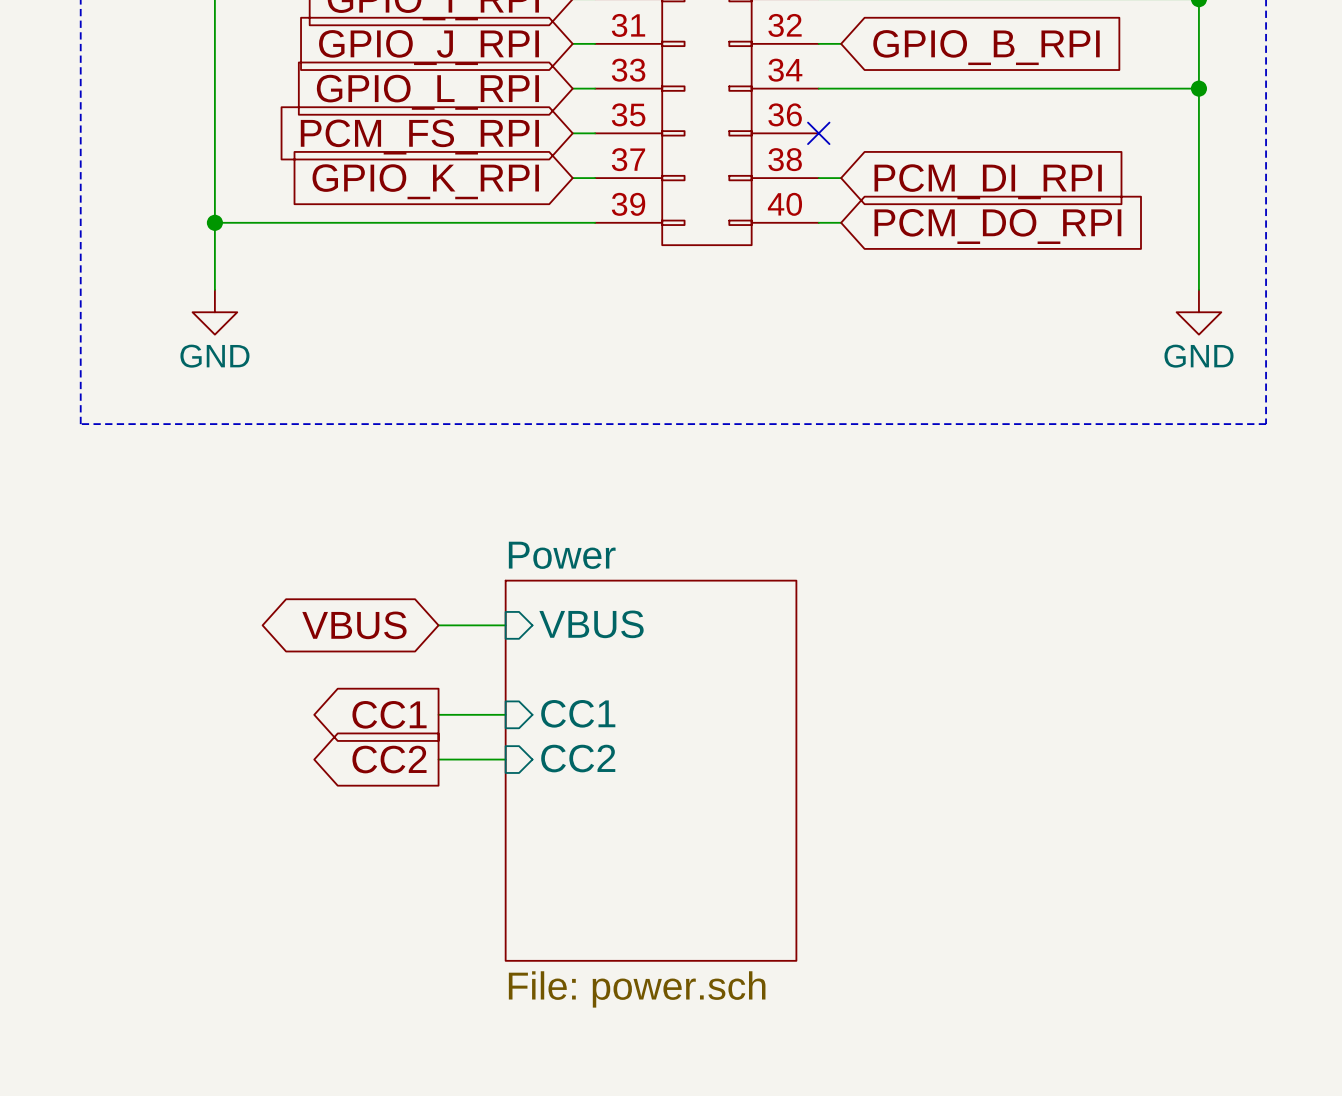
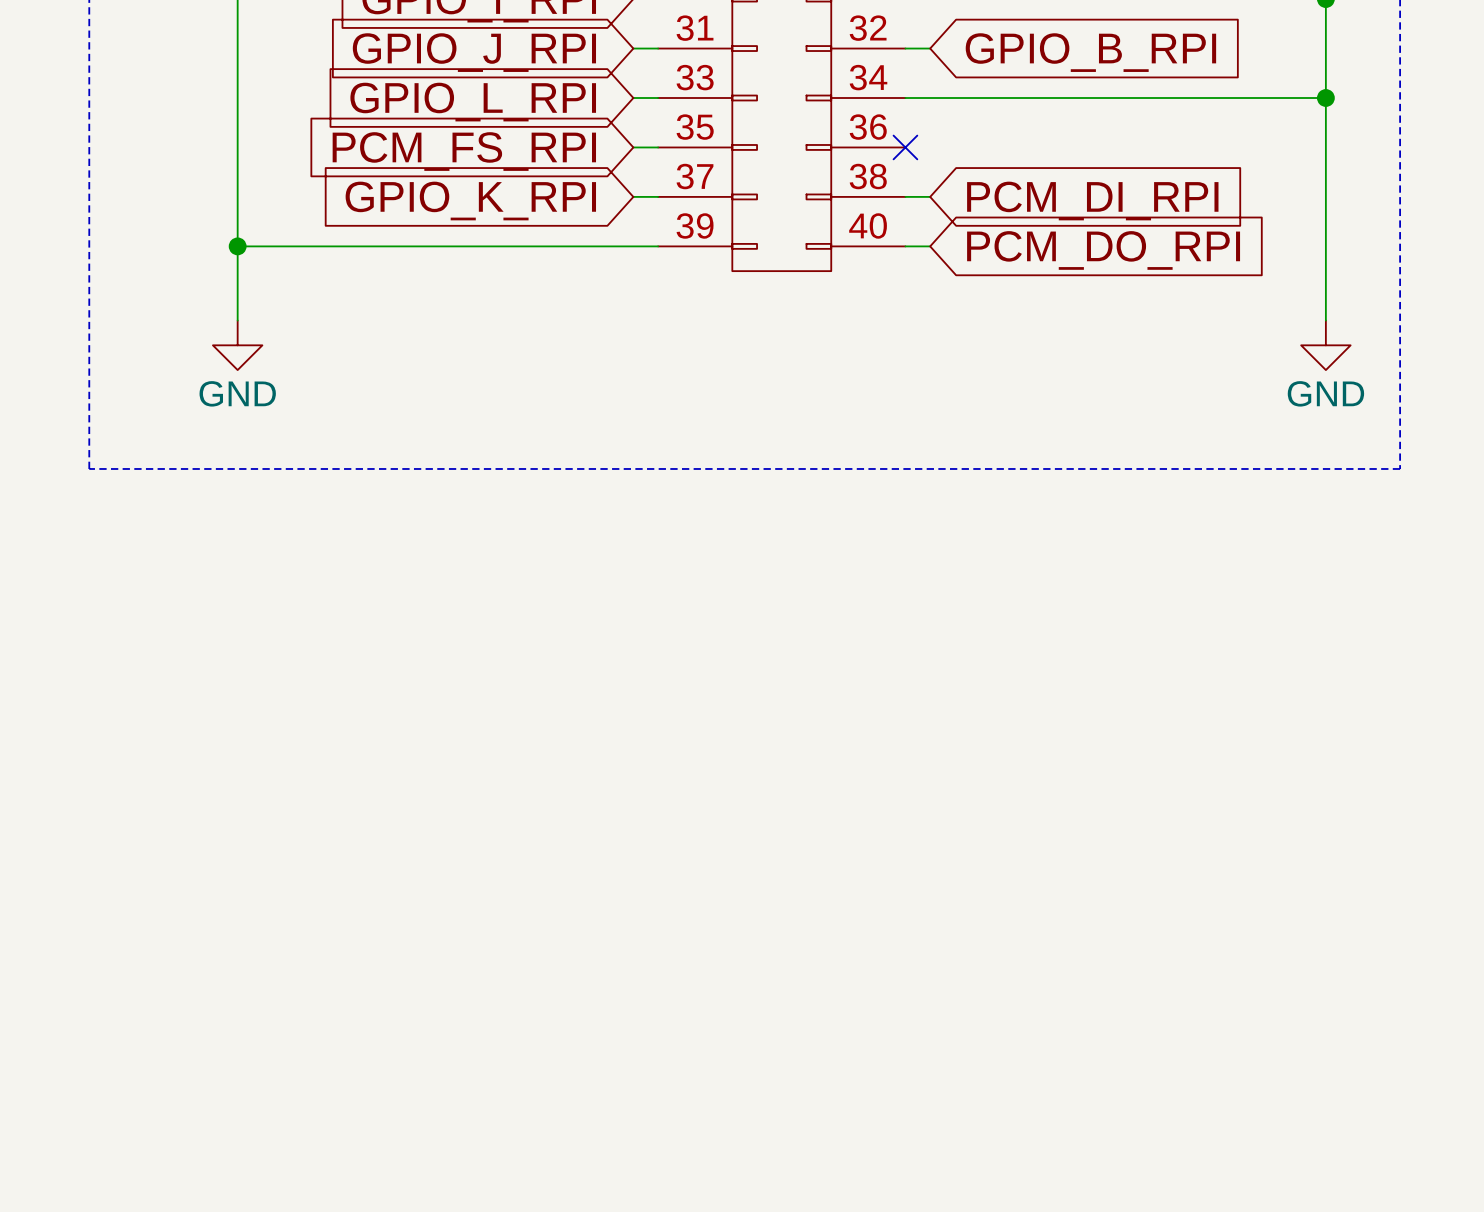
sheet pin: VBUS (591, 624) -> none
global label: VBUS (354, 625) -> none
wire: (438, 625) (505, 625) -> none
sheet pin: CC1 (578, 713) -> none
global label: CC1 (389, 714) -> none
wire: (438, 714) (505, 714) -> none
sheet pin: CC2 (578, 758) -> none
global label: CC2 (389, 759) -> none
wire: (438, 759) (505, 759) -> none
sheet Power: File: power.sch (651, 770) -> none

